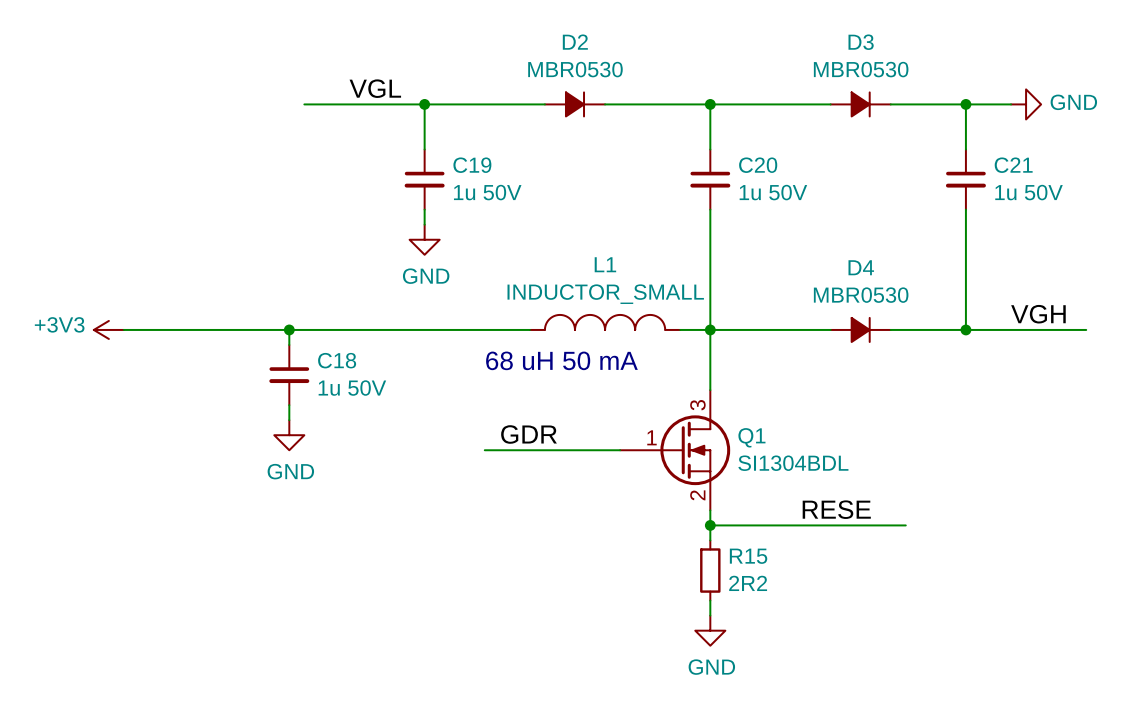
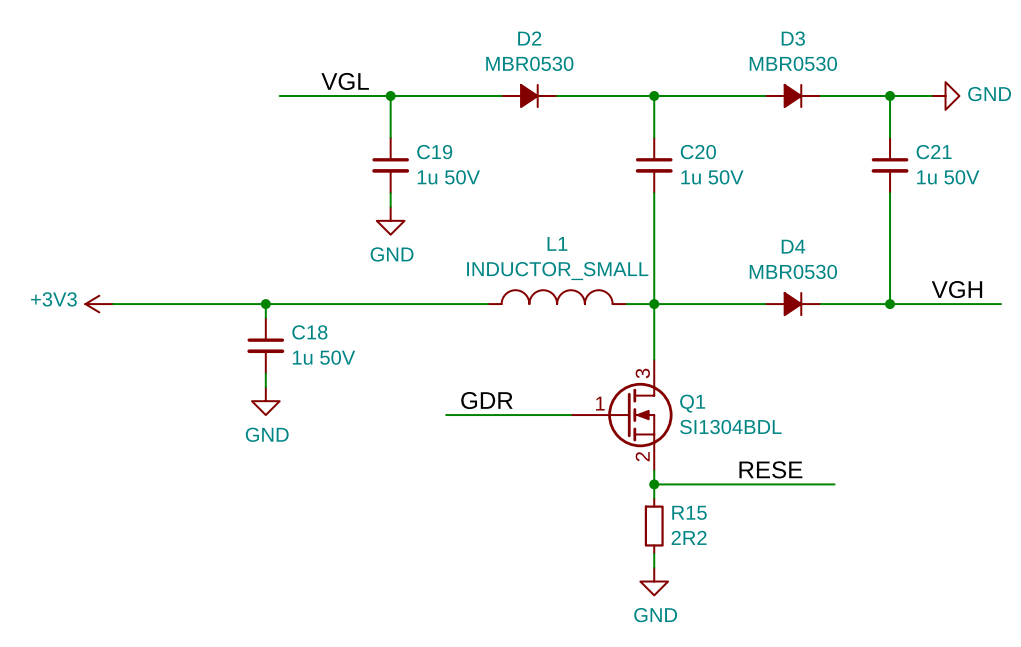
text: 68 uH 50 mA (561, 360) -> none

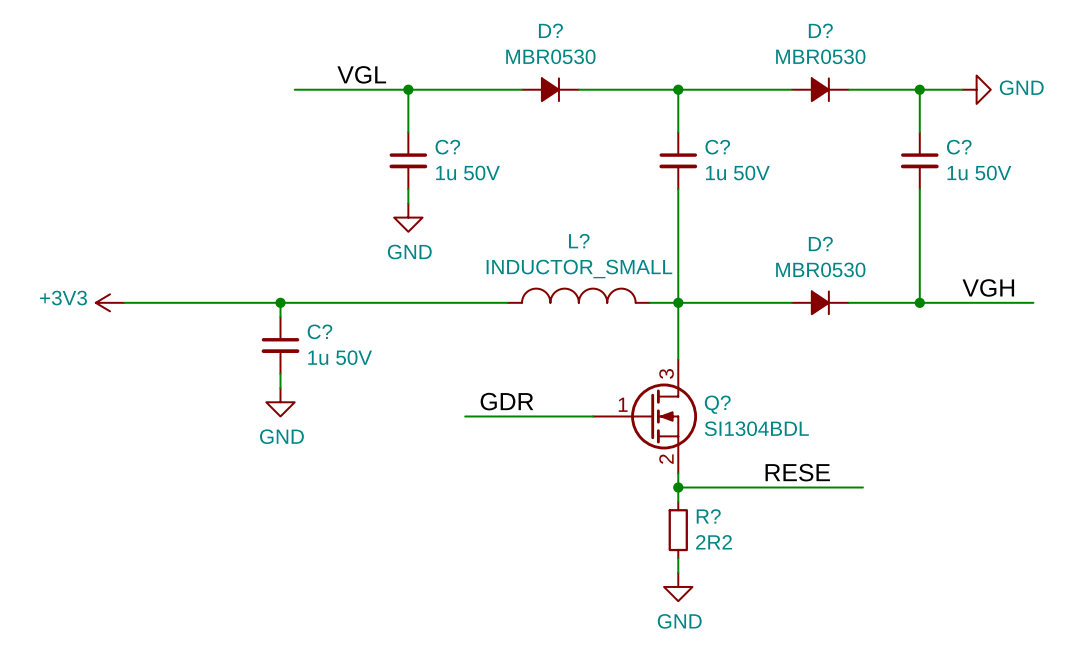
D2 name: D2 (529, 38) -> D? (550, 30)
D3 name: D3 (793, 38) -> D? (820, 30)
C19 name: C19 (434, 152) -> C? (447, 147)
C20 name: C20 (698, 152) -> C? (717, 147)
C21 name: C21 (934, 152) -> C? (959, 147)
L1 name: L1 (557, 243) -> L? (579, 241)
D4 name: D4 (793, 246) -> D? (820, 243)
C18 name: C18 (309, 332) -> C? (319, 331)
Q1 name: Q1 (692, 403) -> Q? (717, 404)
R15 name: R15 (689, 512) -> R? (708, 516)

